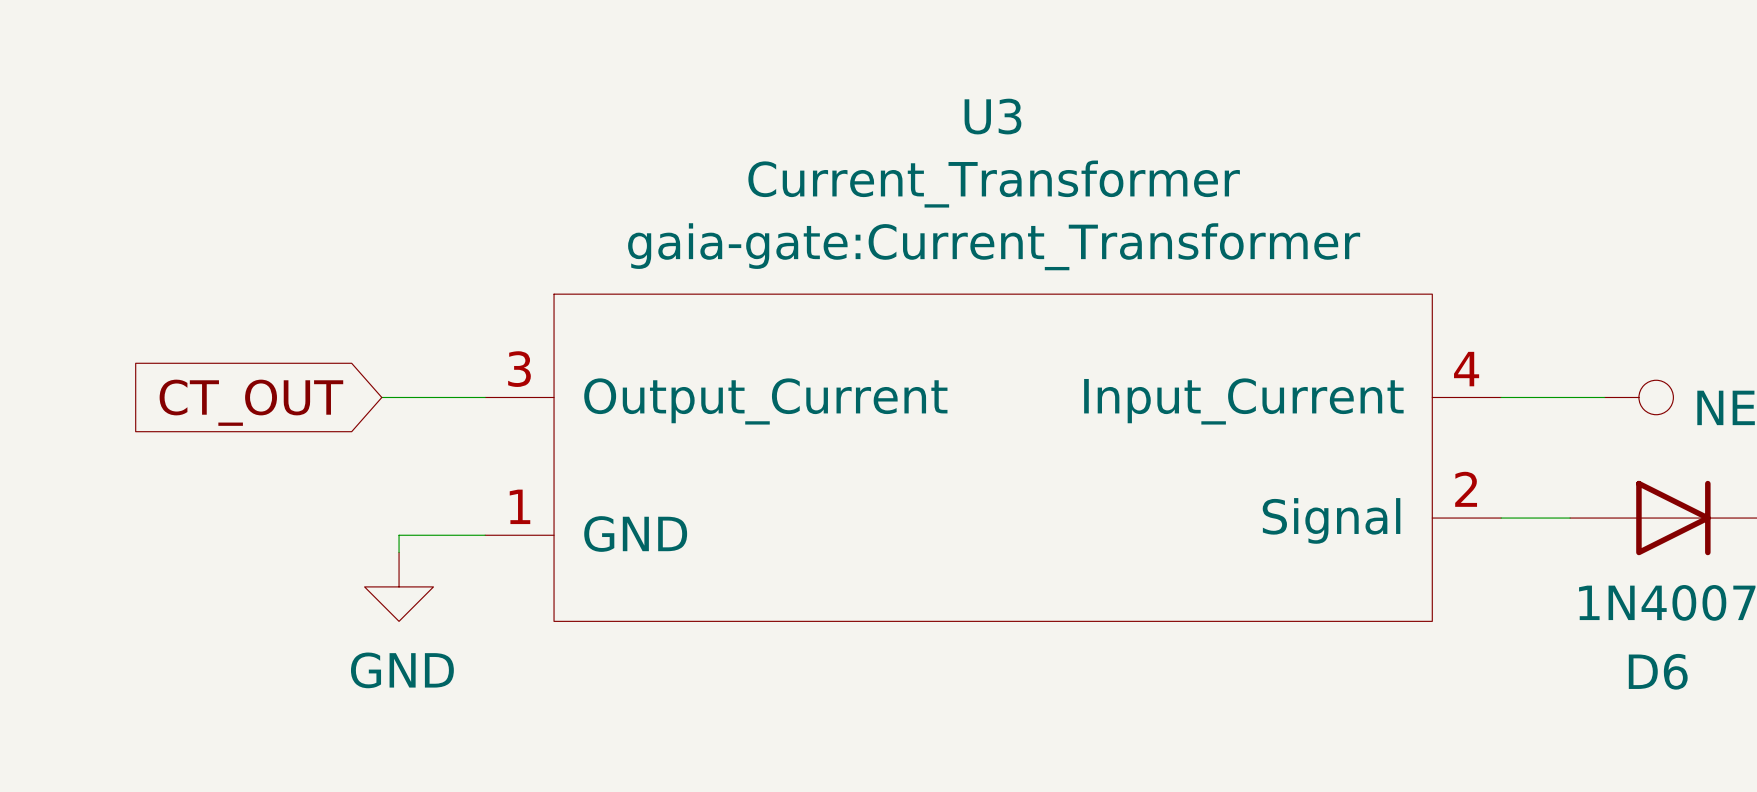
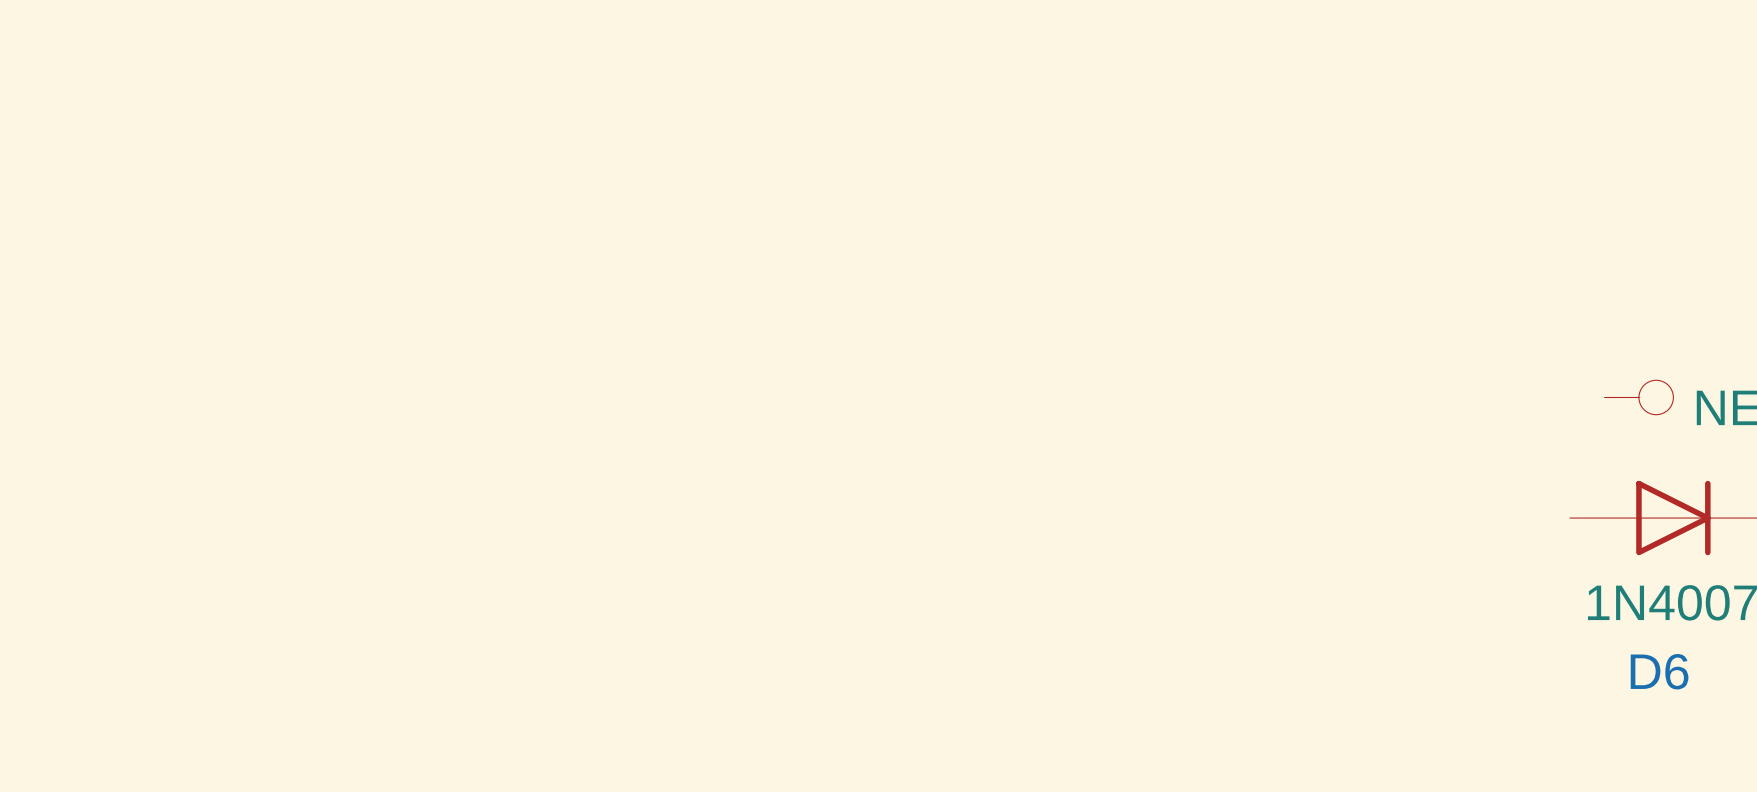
wire: (381, 397) (485, 397) -> none
wire: (1501, 397) (1604, 397) -> none
global label: CT_OUT (251, 402) -> none
U3: Current_Transformer (993, 457) -> none
wire: (1501, 518) (1570, 518) -> none
wire: (485, 535) (399, 535) (399, 552) -> none
power symbol: GND (399, 586) -> none

